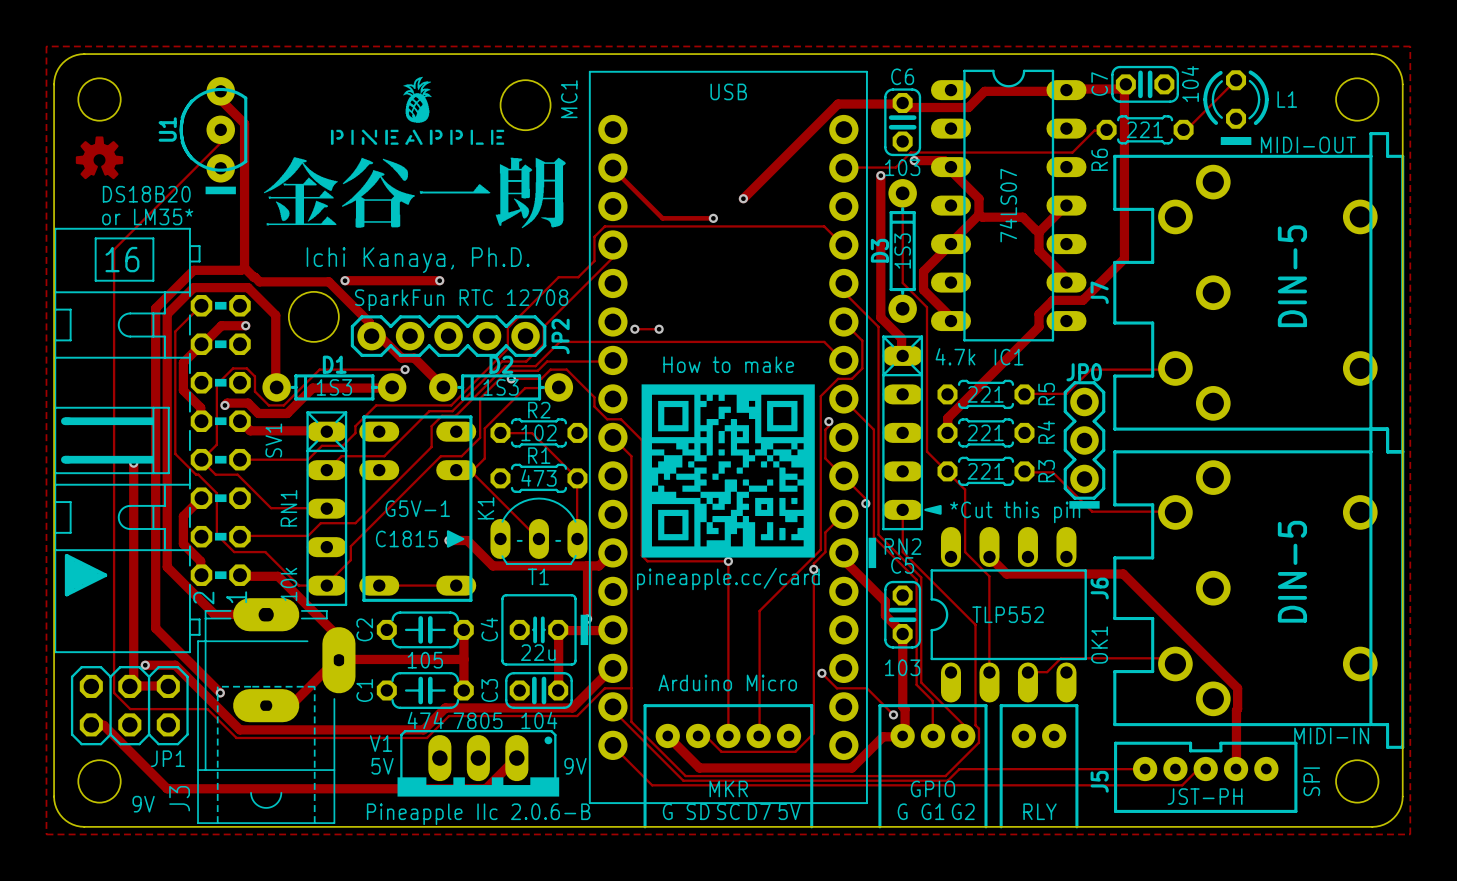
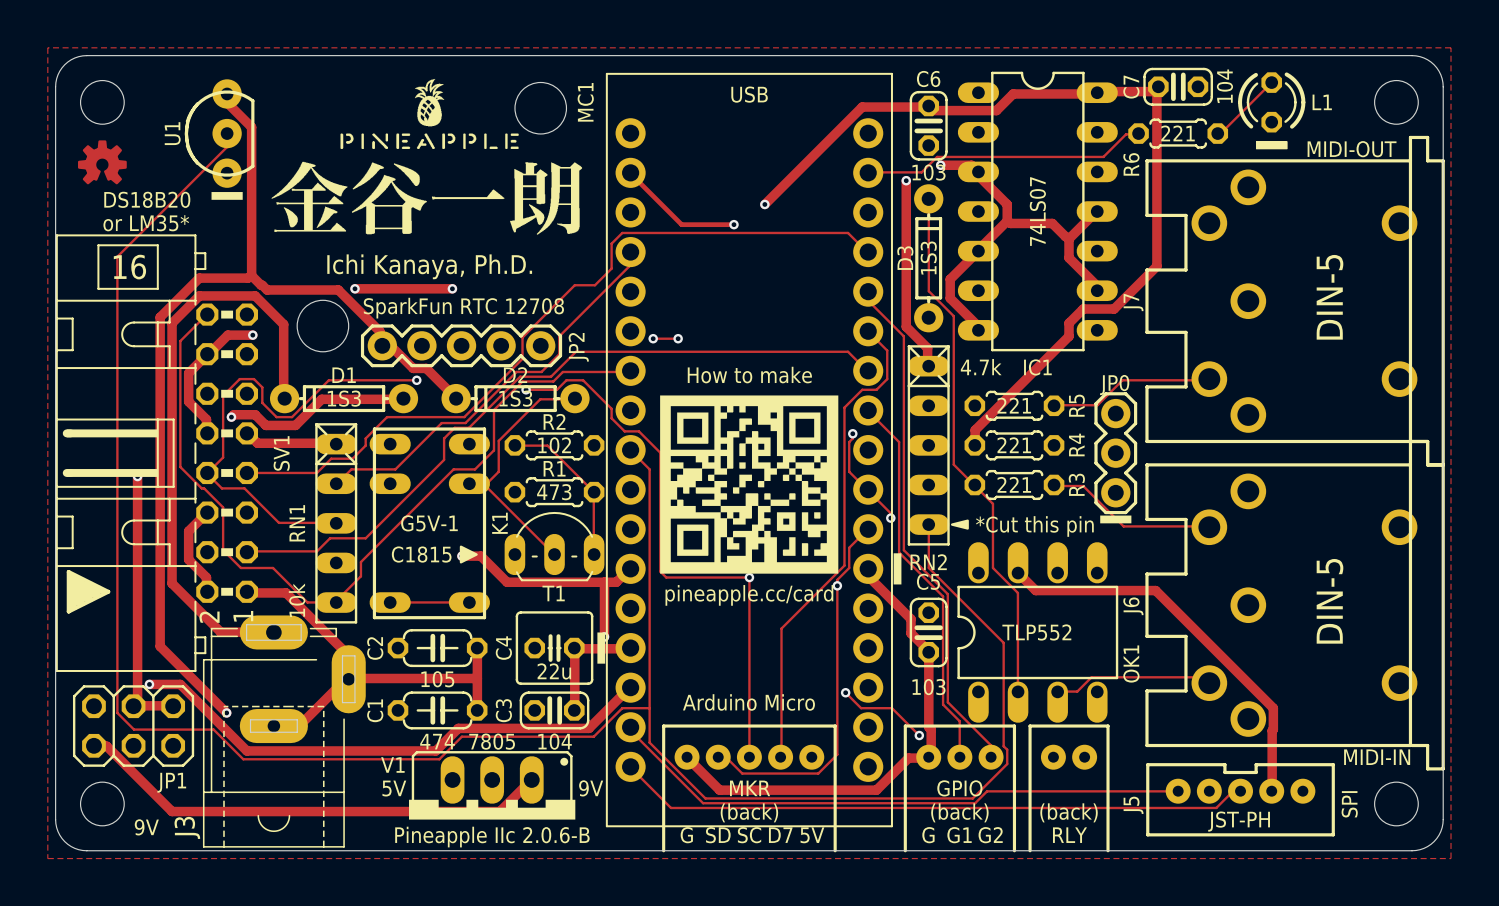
text: none -> MKR (750, 788)
text: none -> GPIO (959, 788)
text: MKR (728, 789) -> (back) (749, 812)
text: GPIO (932, 789) -> (back) (959, 812)
text: none -> (back) (1069, 812)

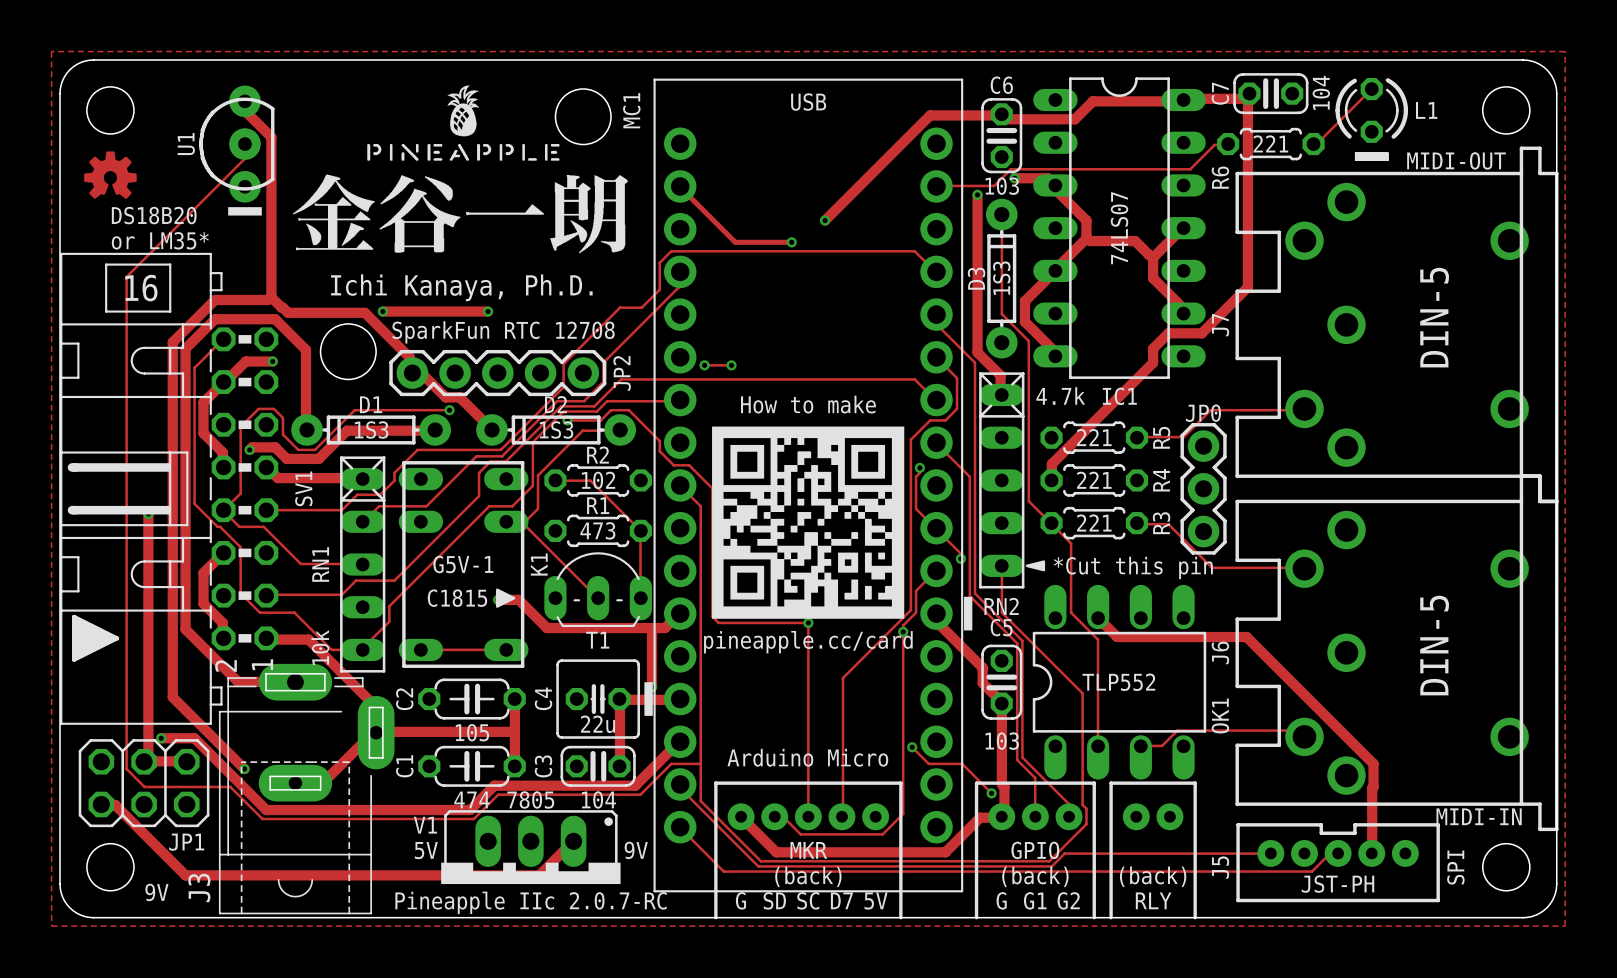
drawing: [1100, 515, 1132, 524] -> none
text: Pineapple IIc 2.0.6-B (492, 837) -> Pineapple IIc 2.0.7-RC (531, 902)

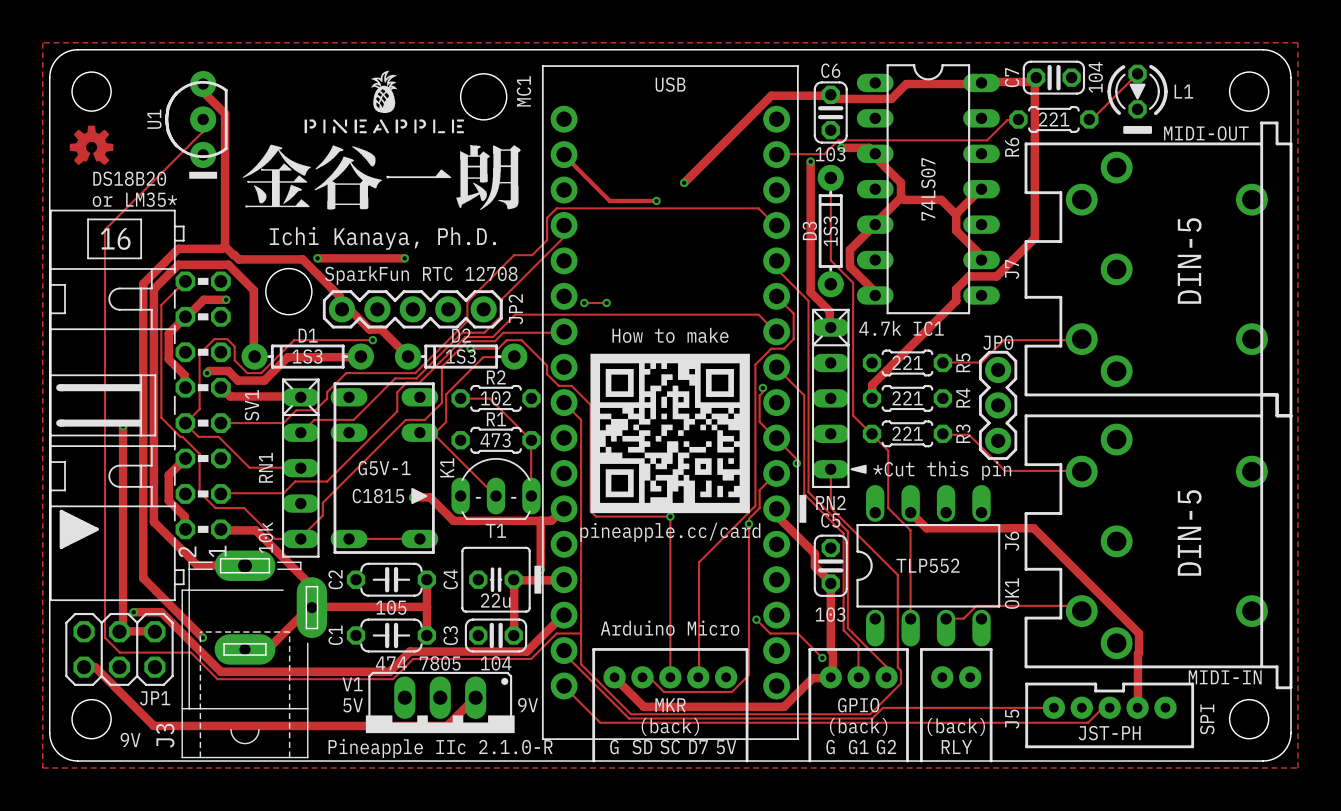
drawing: none -> [1129, 83, 1146, 100]
text: Pineapple IIc 2.0.7-RC (531, 902) -> Pineapple IIc 2.1.0-R (440, 748)

